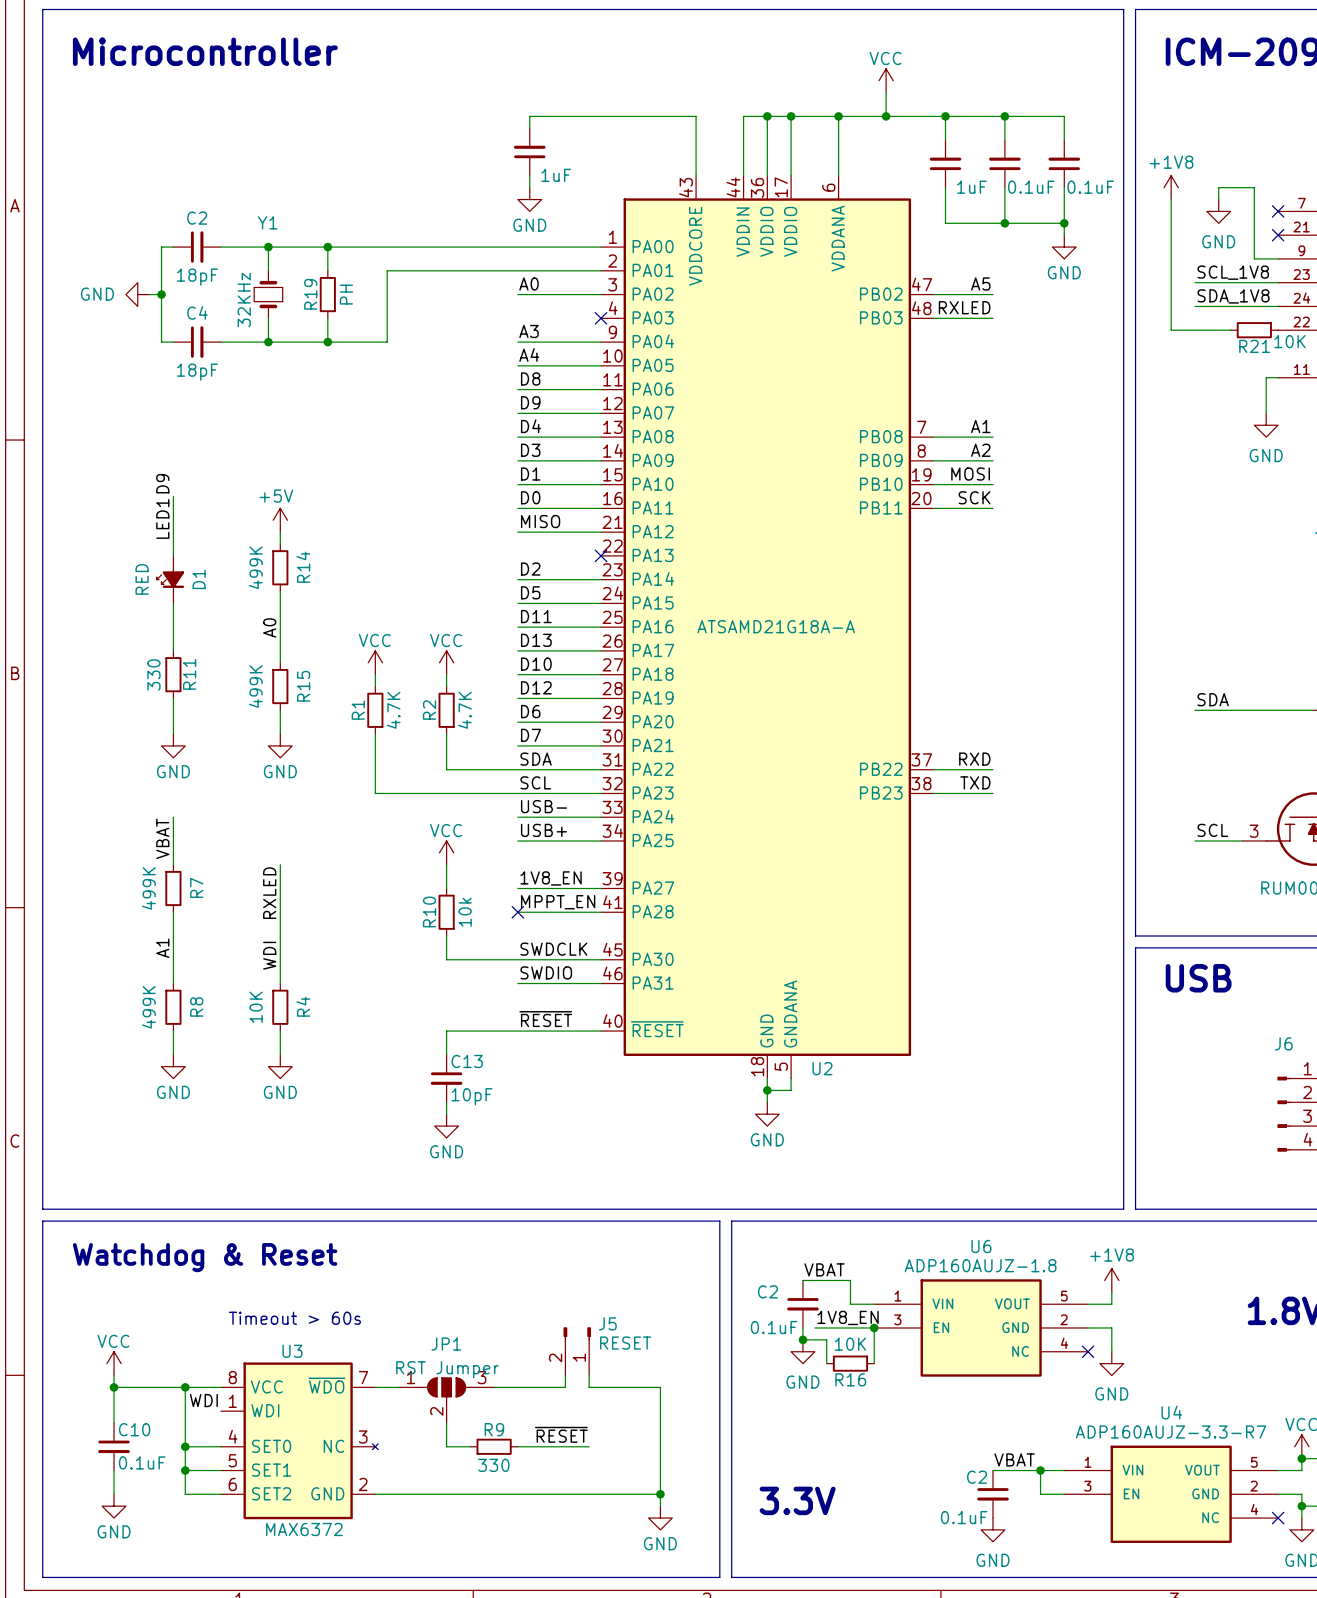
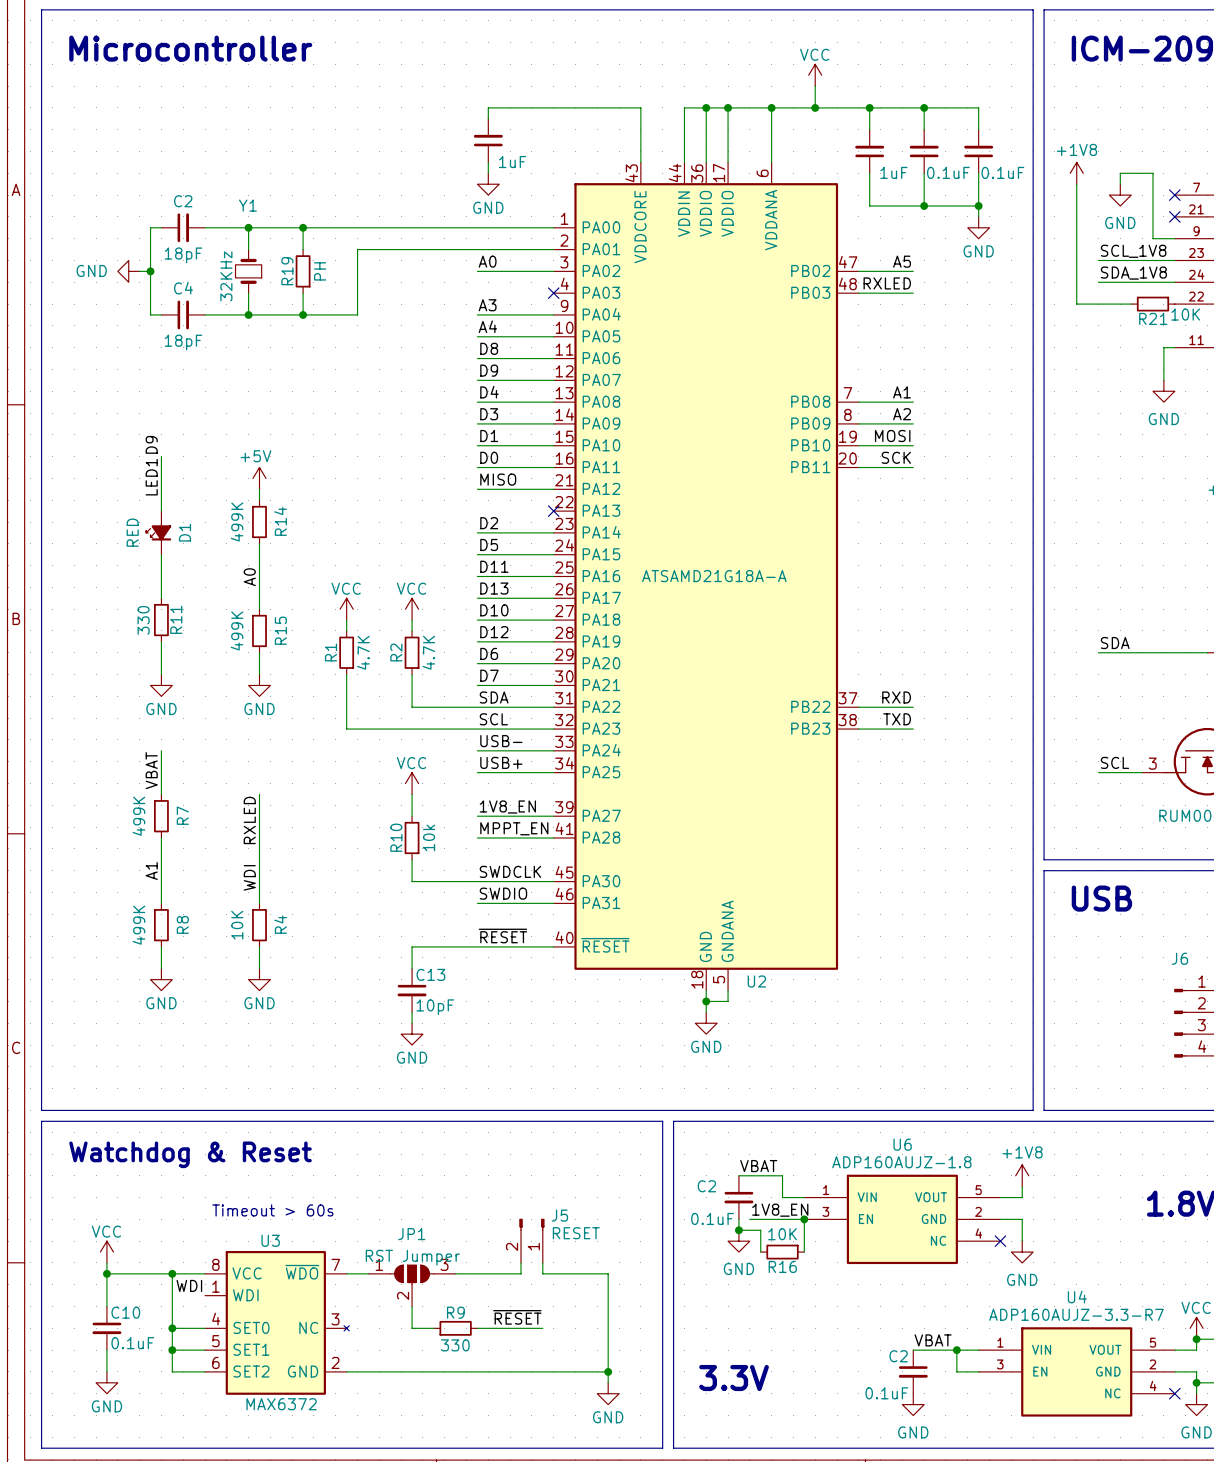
no-connect mark: (517, 912) -> none

